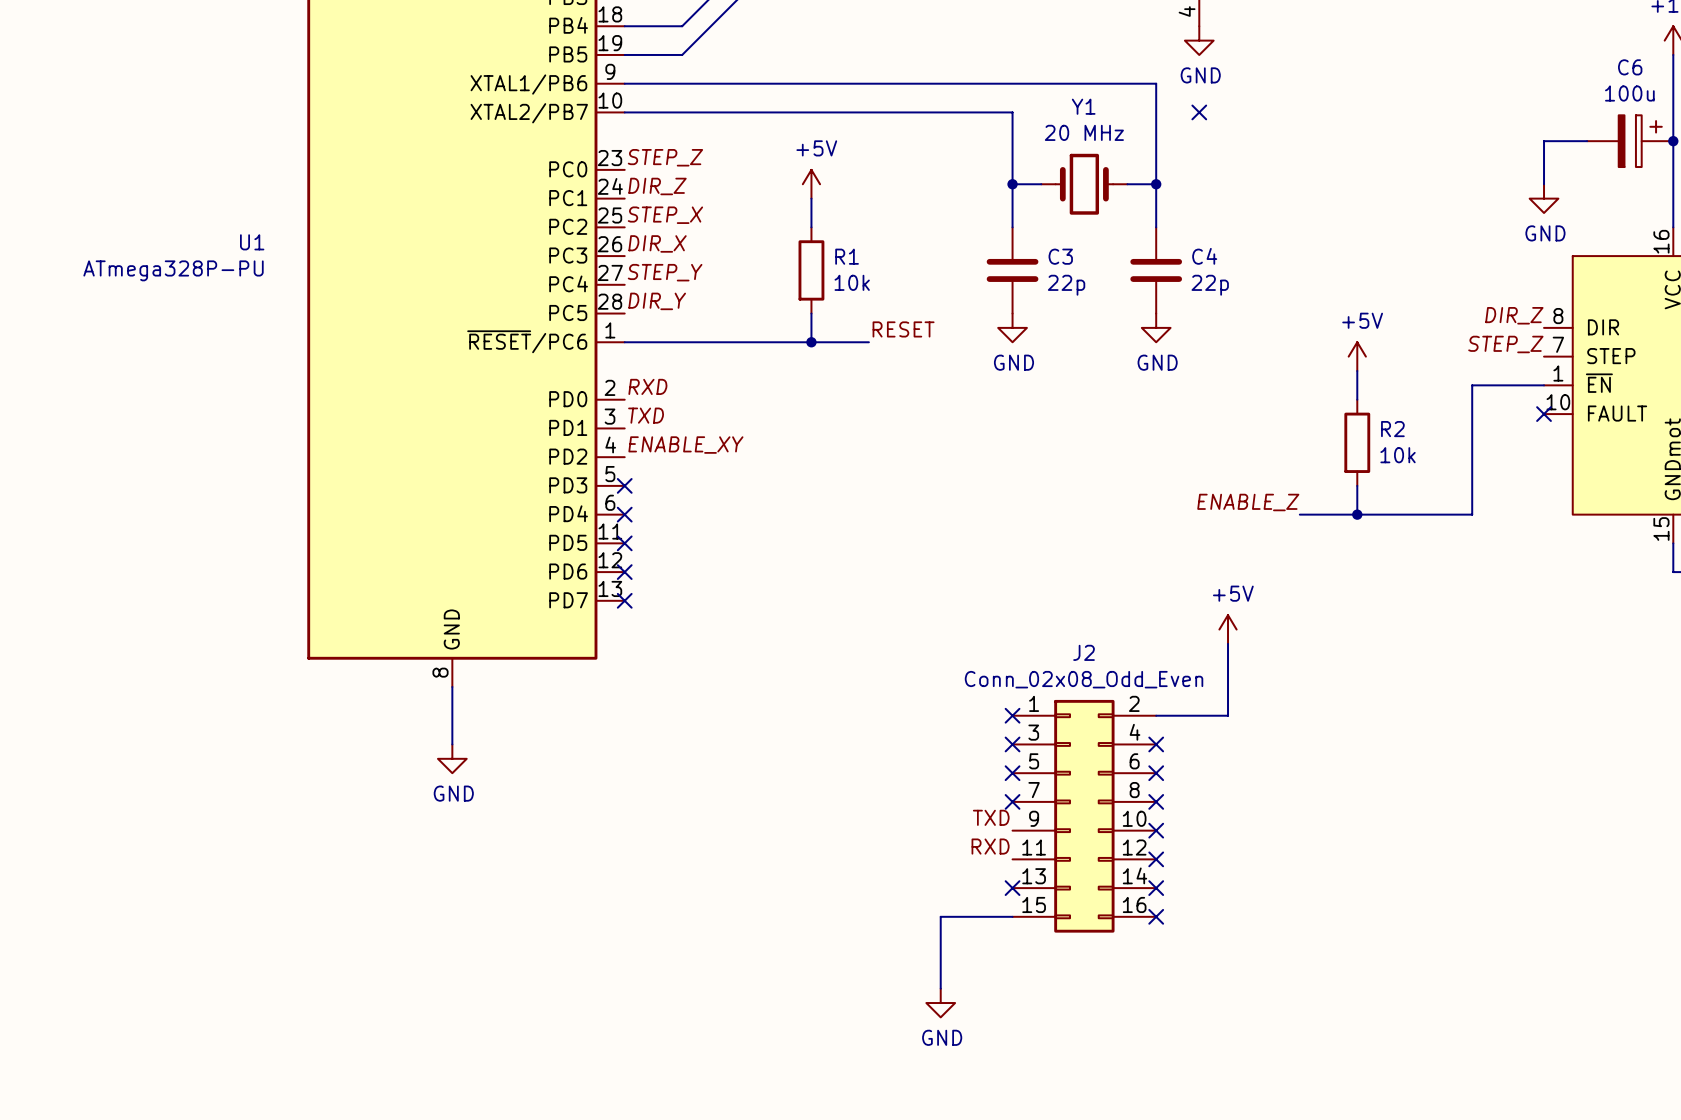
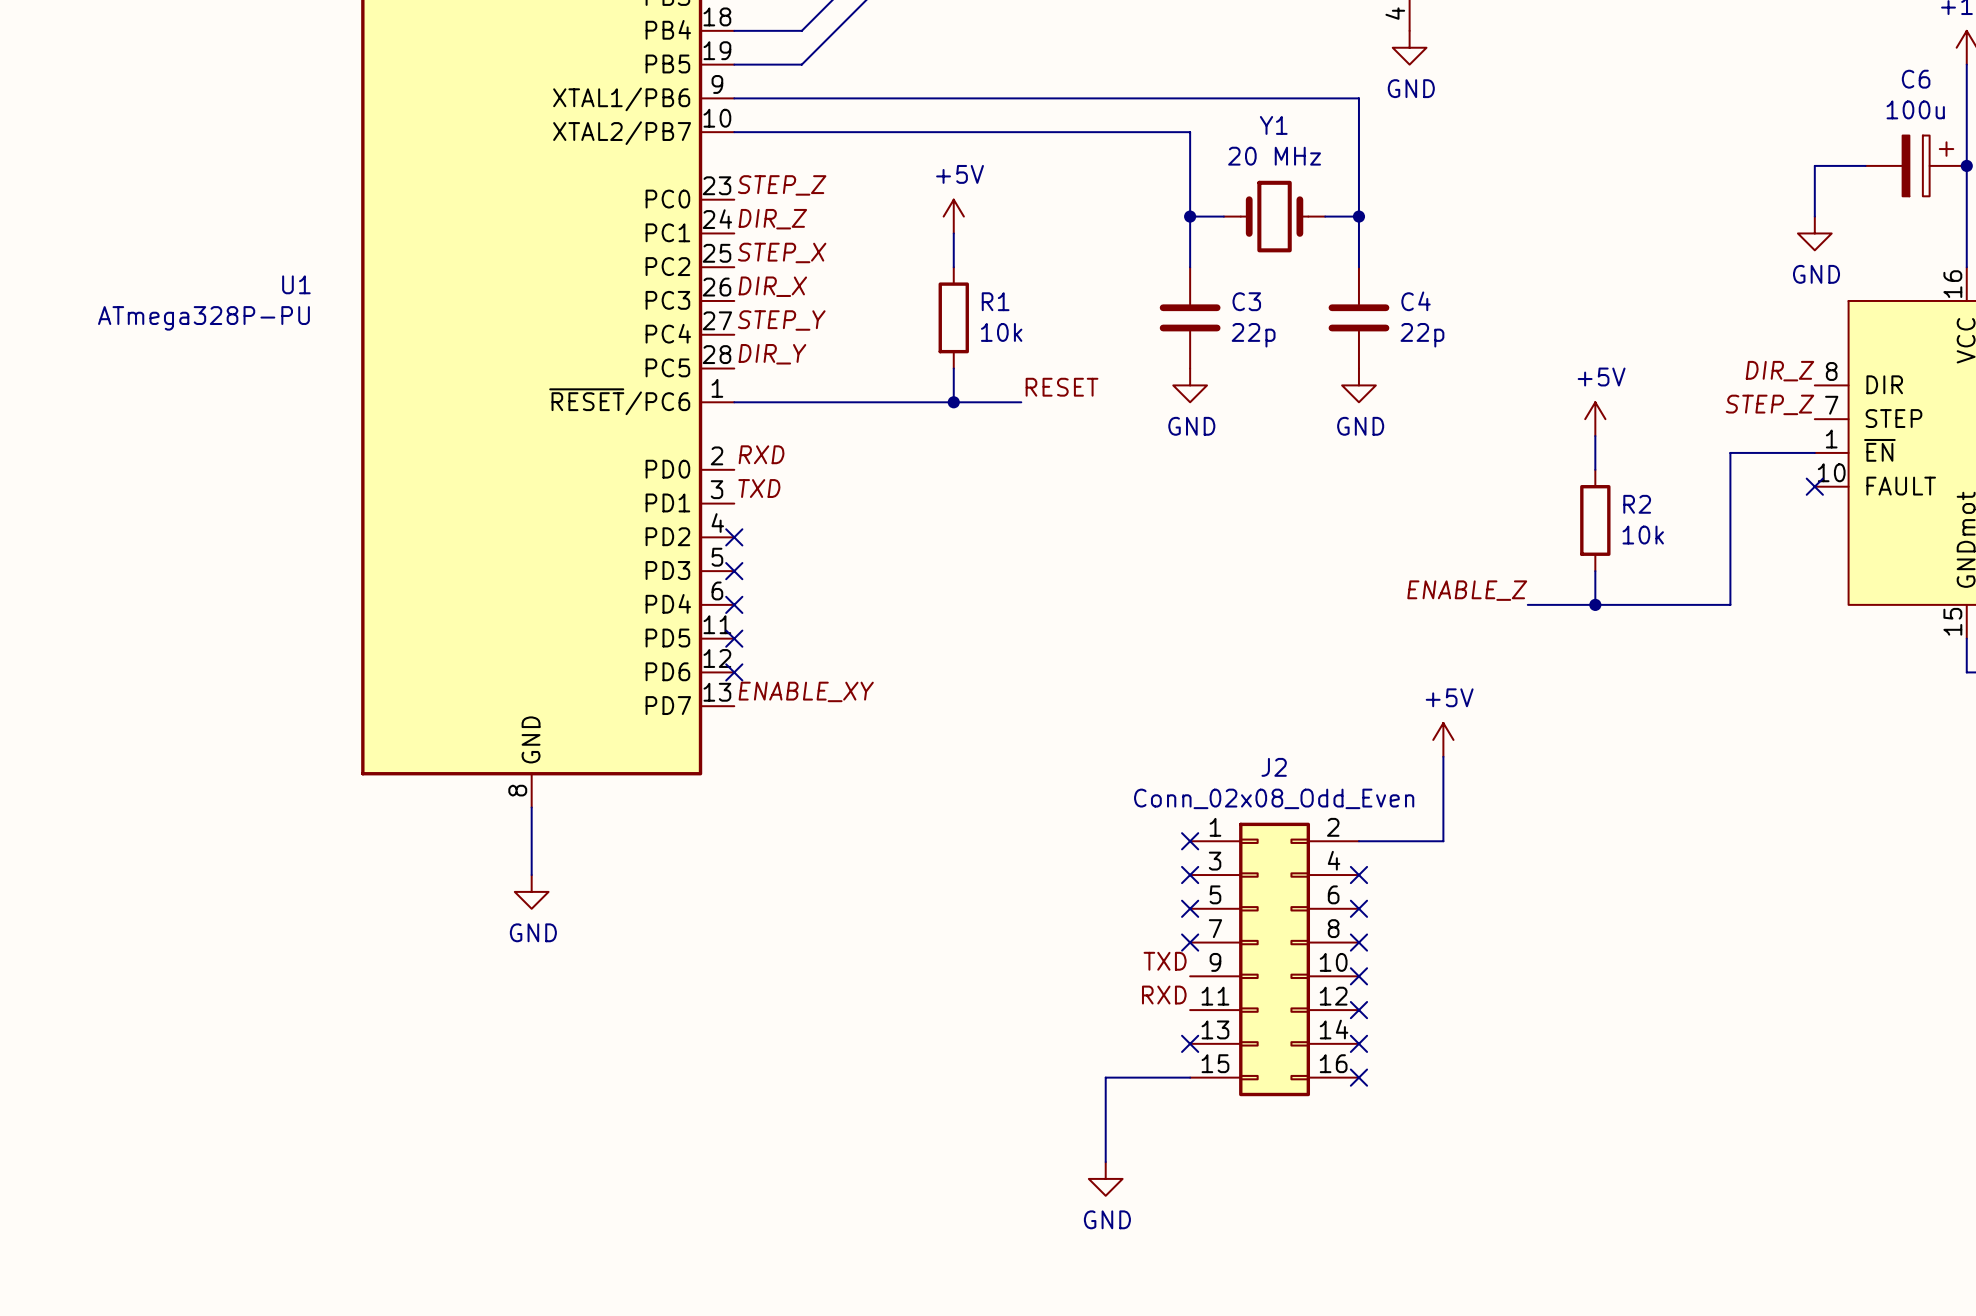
no-connect mark: (1199, 112) -> none
label position: ENABLE_XY (685, 445) -> ENABLE_XY (806, 691)
no-connect mark: none -> (734, 537)
no-connect mark: (624, 600) -> none

